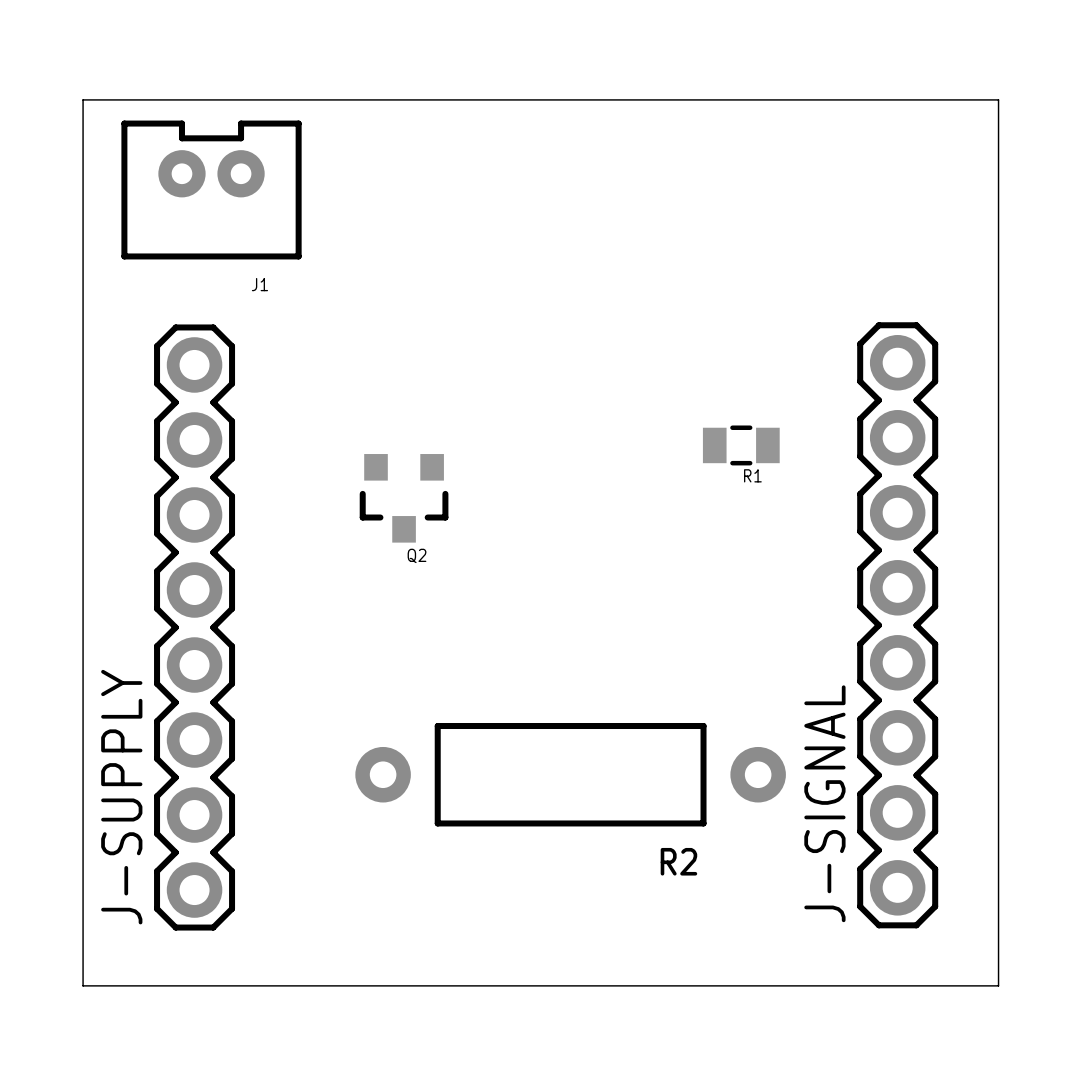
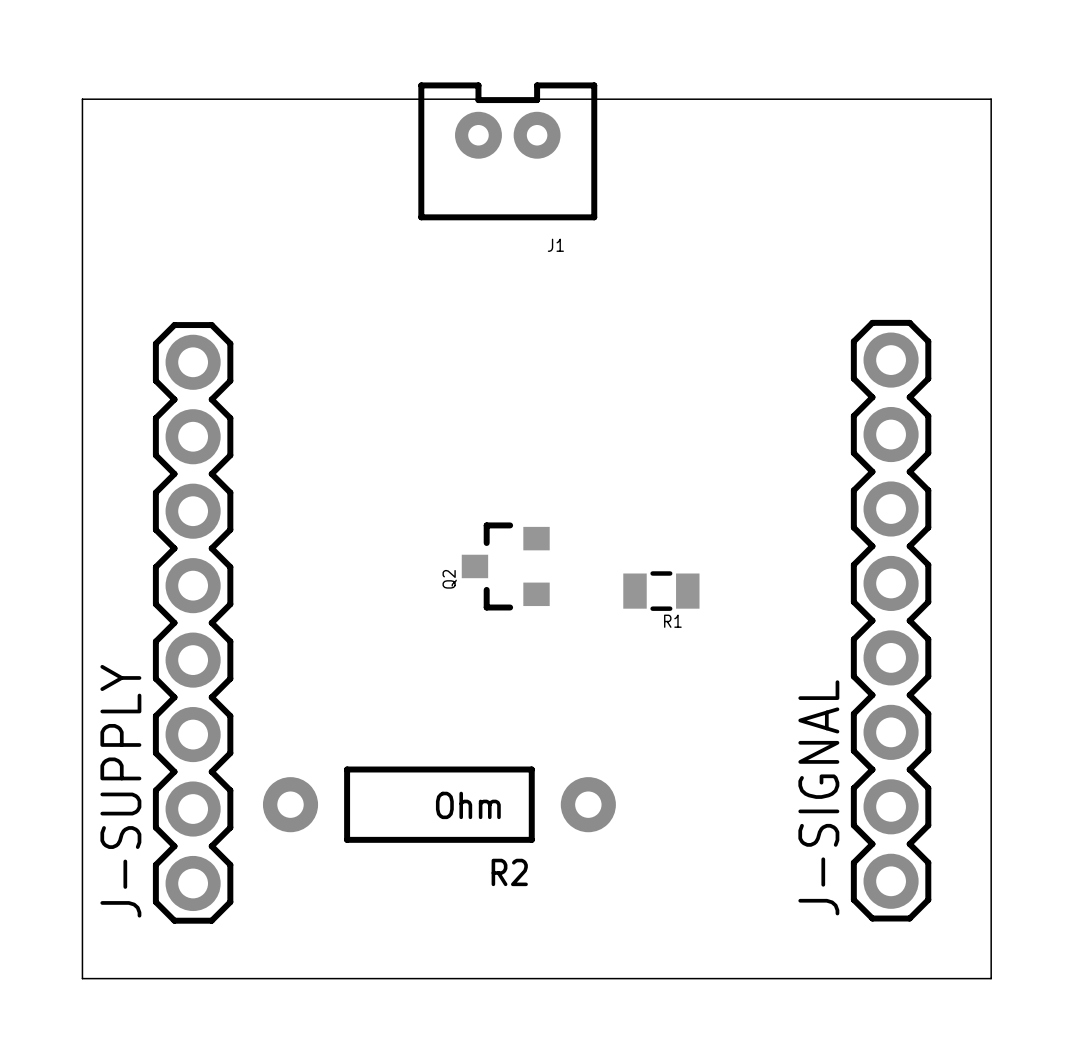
J1 position: (211, 190) -> (507, 151)
R1 position: (741, 445) -> (661, 591)
Q2 rotation: 0° (404, 498) -> 90° clockwise (505, 566)
Q2 position: (404, 498) -> (505, 566)
R2 footprint: [355, 723, 786, 827] -> [262, 766, 616, 843]
R2 value: none -> Ohm (468, 805)

